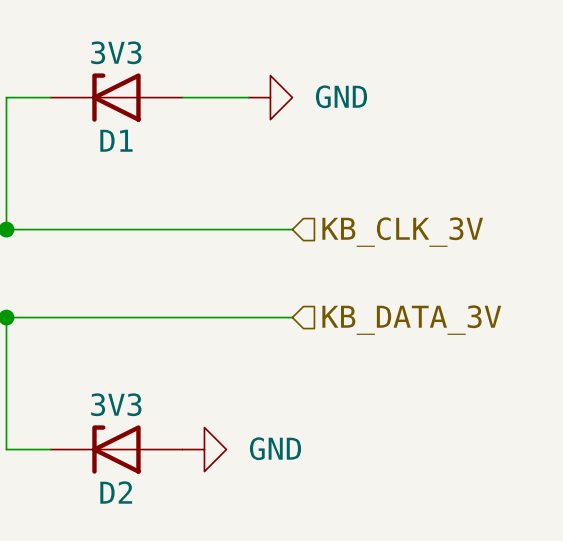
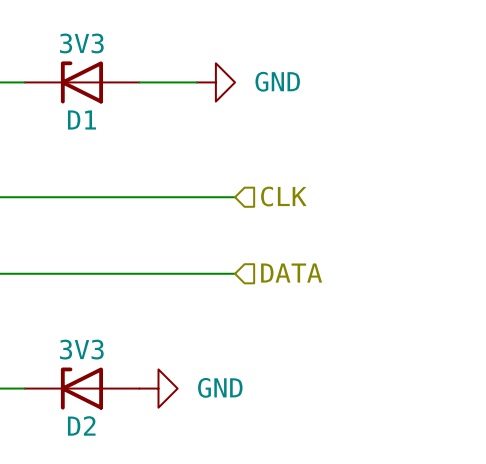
hierarchical label: KB_CLK_3V (402, 232) -> CLK (283, 196)
hierarchical label: KB_DATA_3V (411, 320) -> DATA (291, 273)

